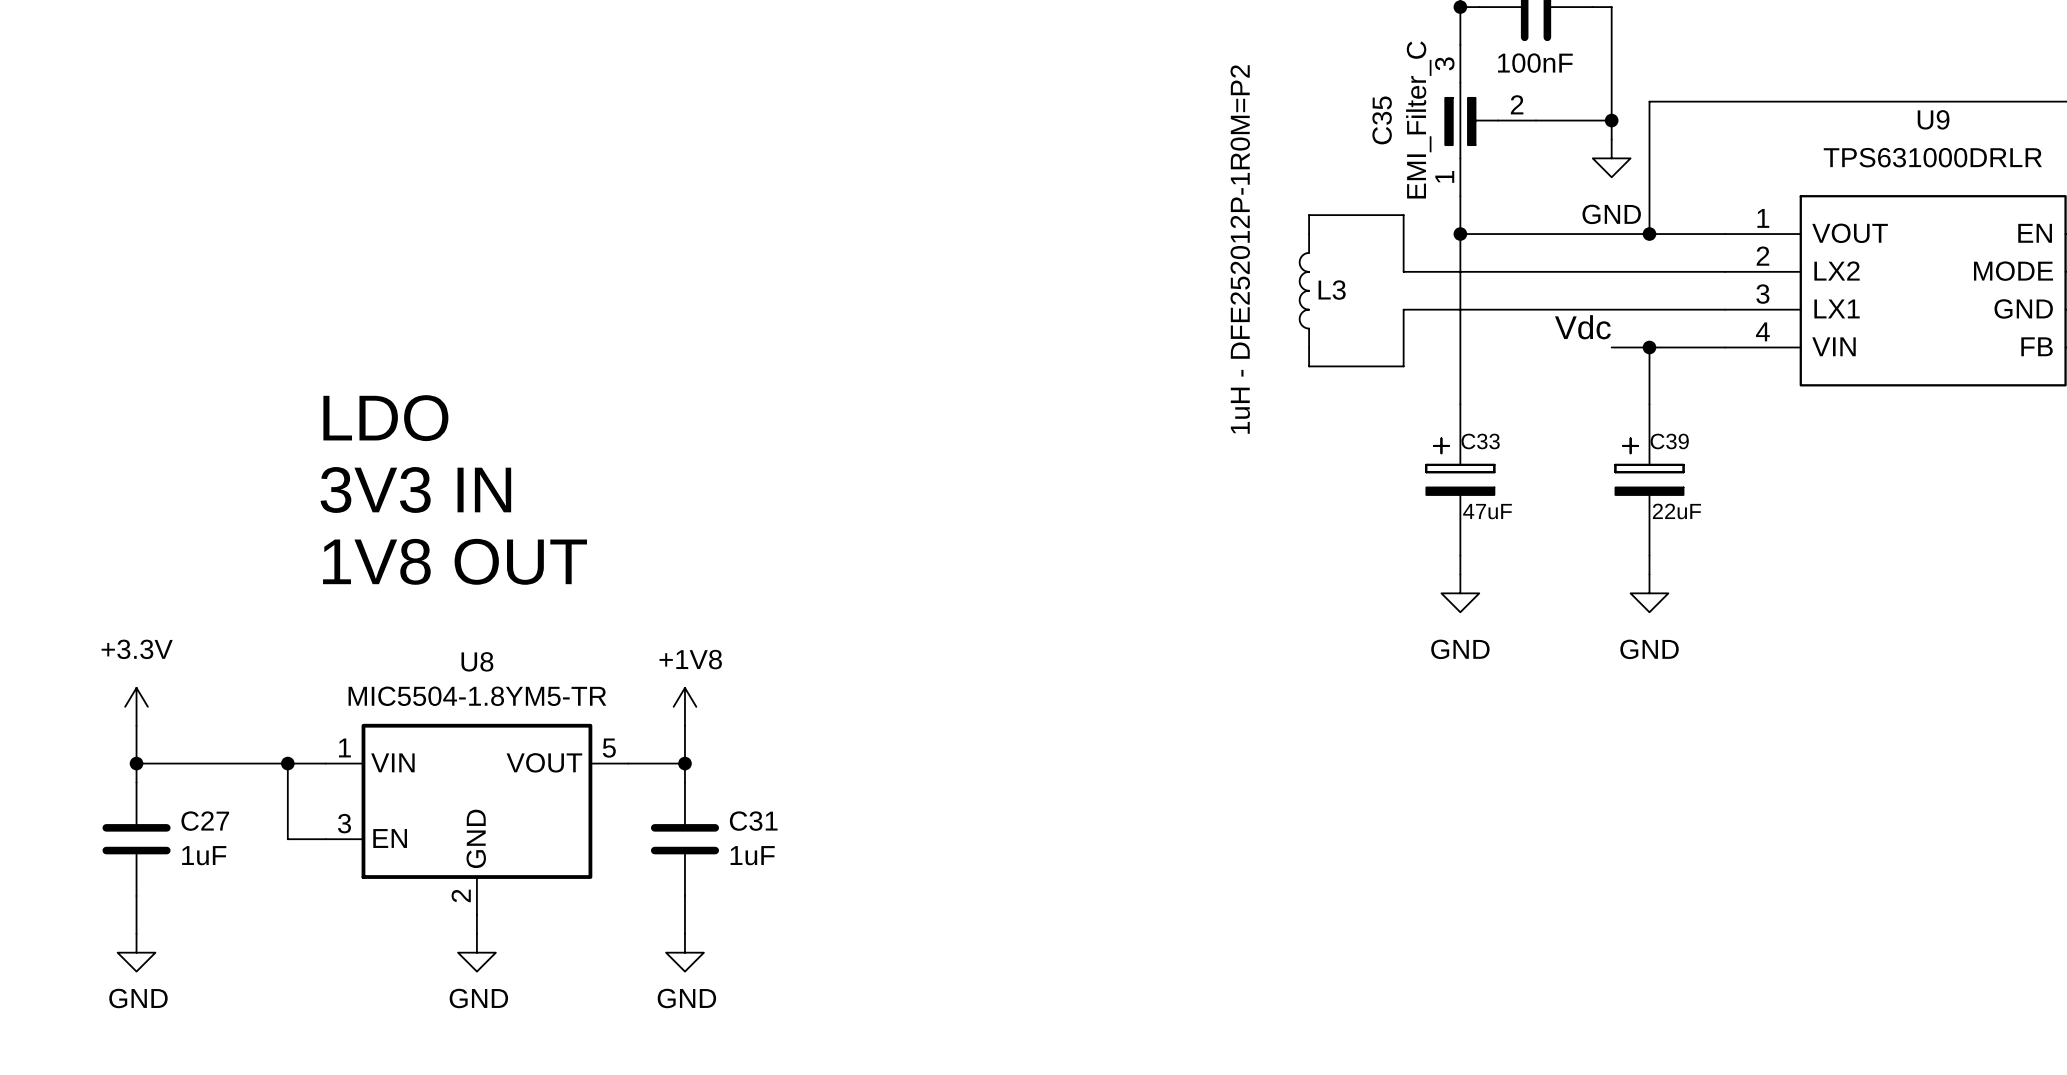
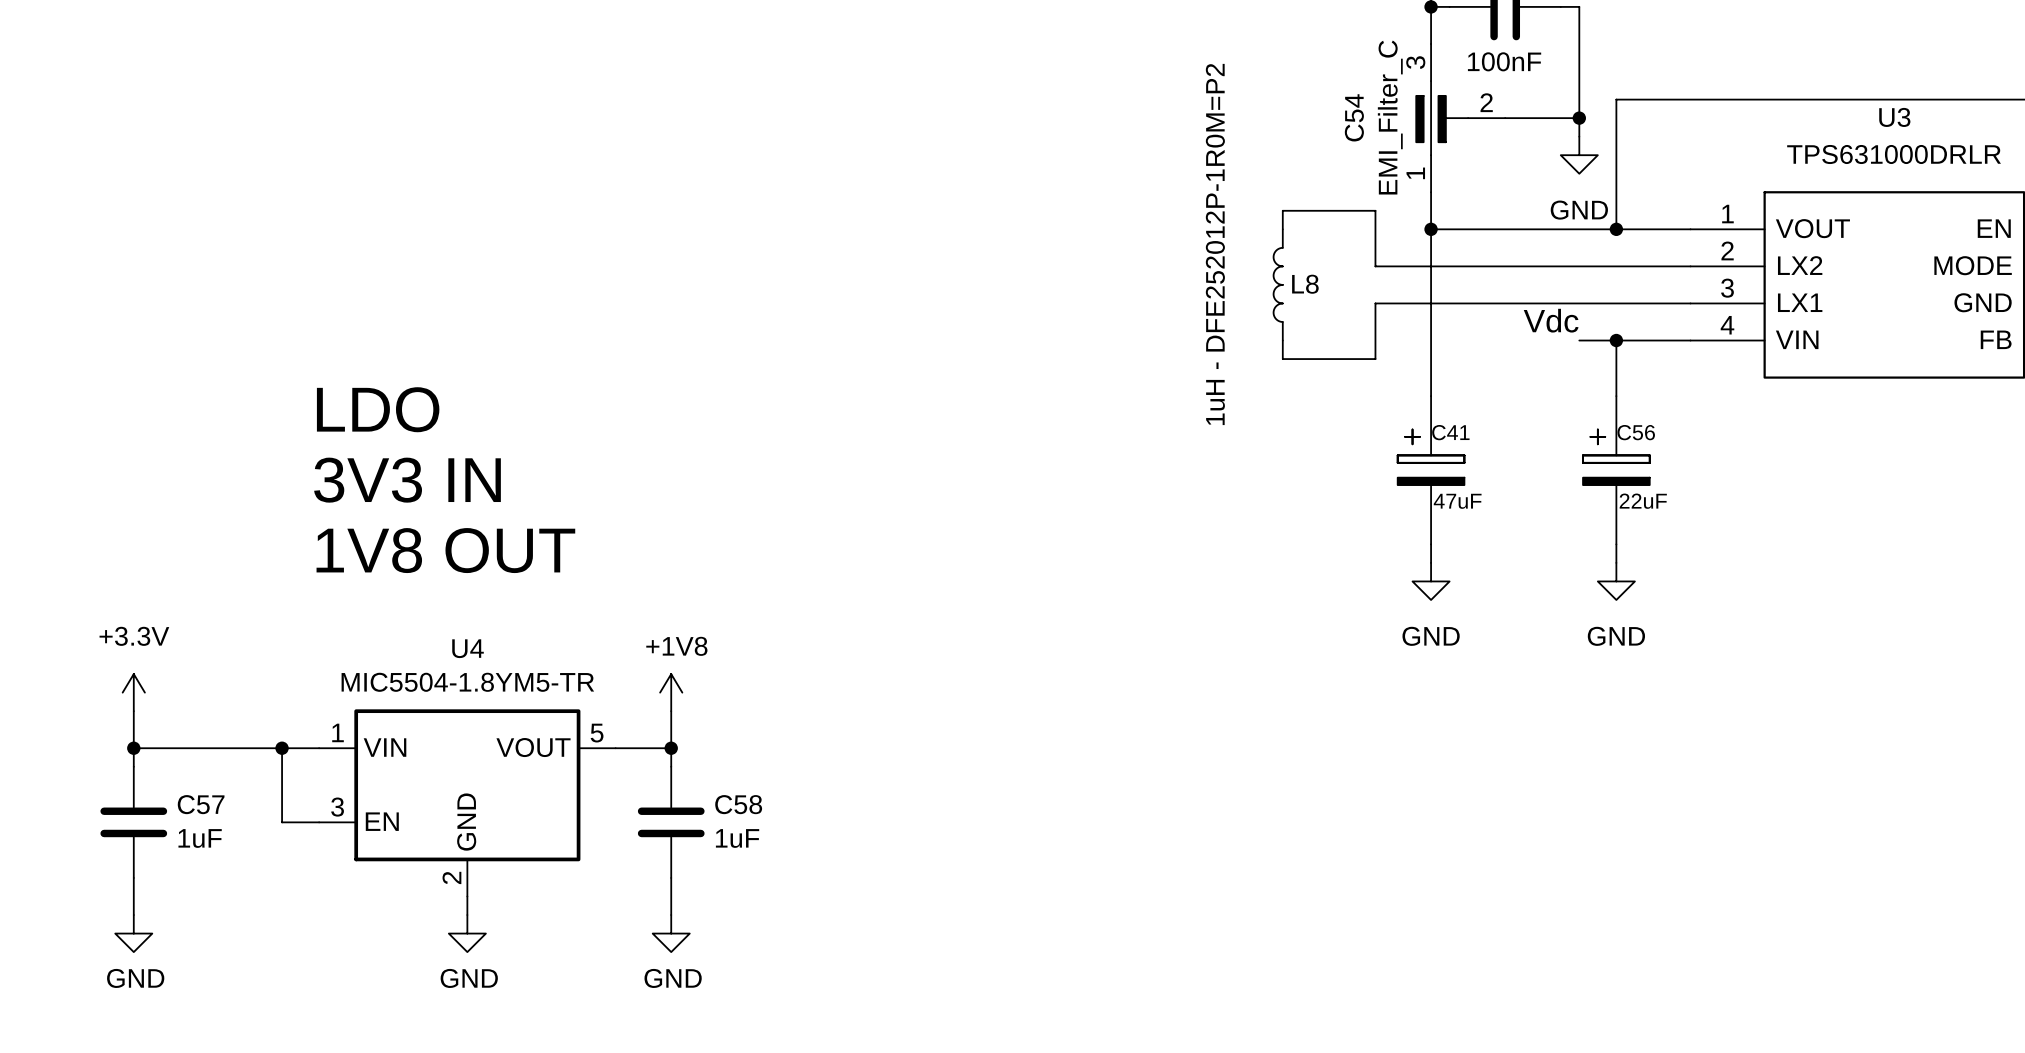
U9 name: U9 (1933, 119) -> U3 (1894, 117)
C35 name: C35 (1382, 120) -> C54 (1354, 117)
L3 name: L3 (1332, 290) -> L8 (1305, 284)
C33 name: C33 (1480, 441) -> C41 (1450, 432)
C39 name: C39 (1669, 441) -> C56 (1636, 432)
U8 name: U8 (477, 661) -> U4 (468, 648)
C27 name: C27 (205, 821) -> C57 (201, 804)
C31 name: C31 (753, 821) -> C58 (738, 804)

